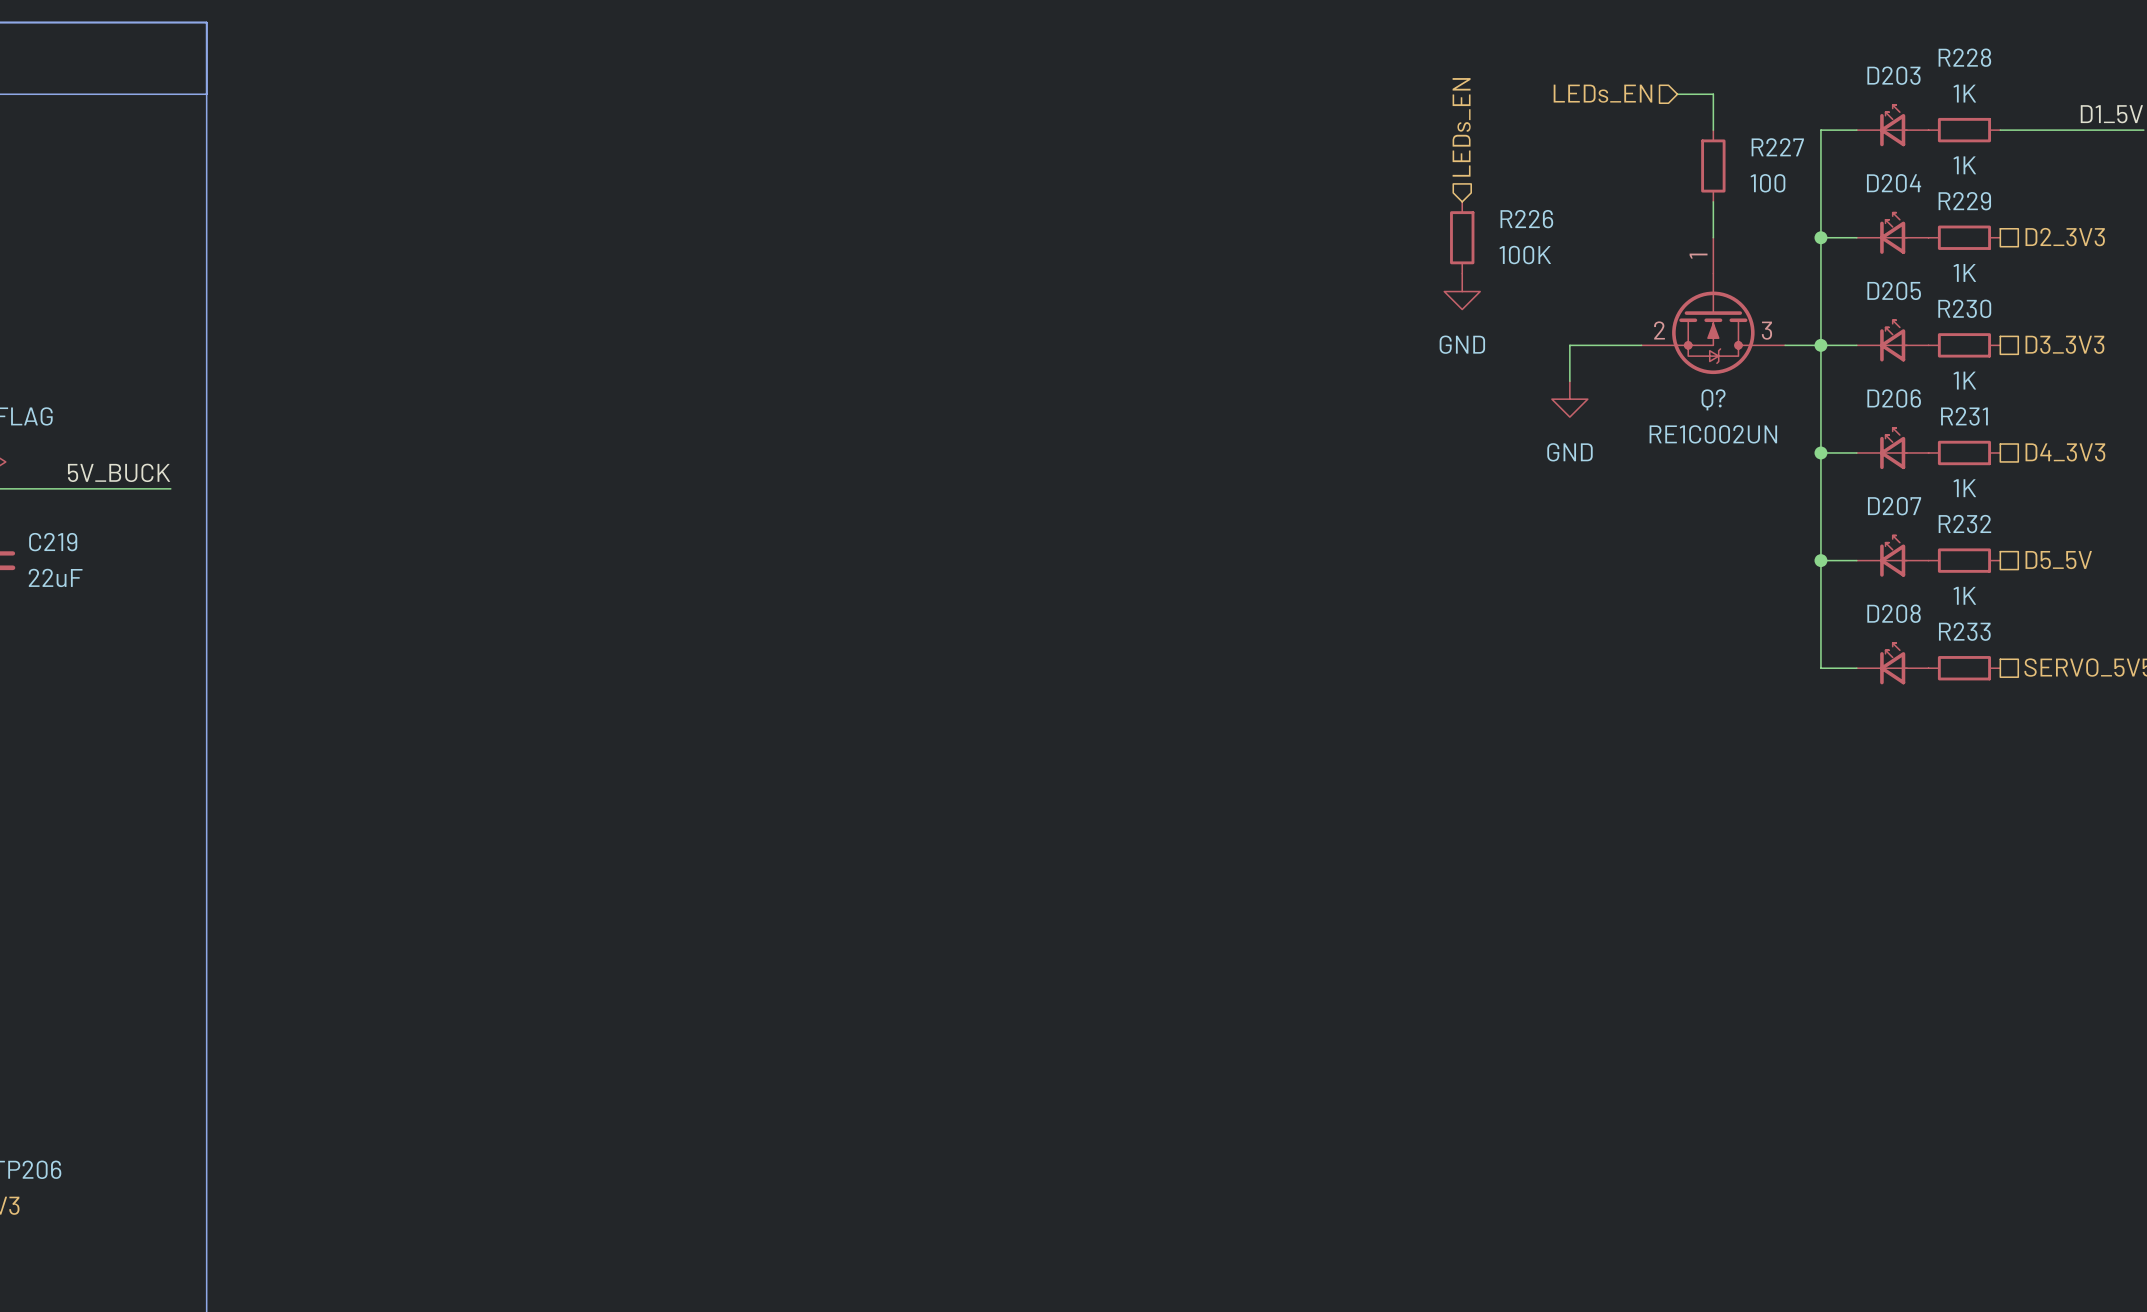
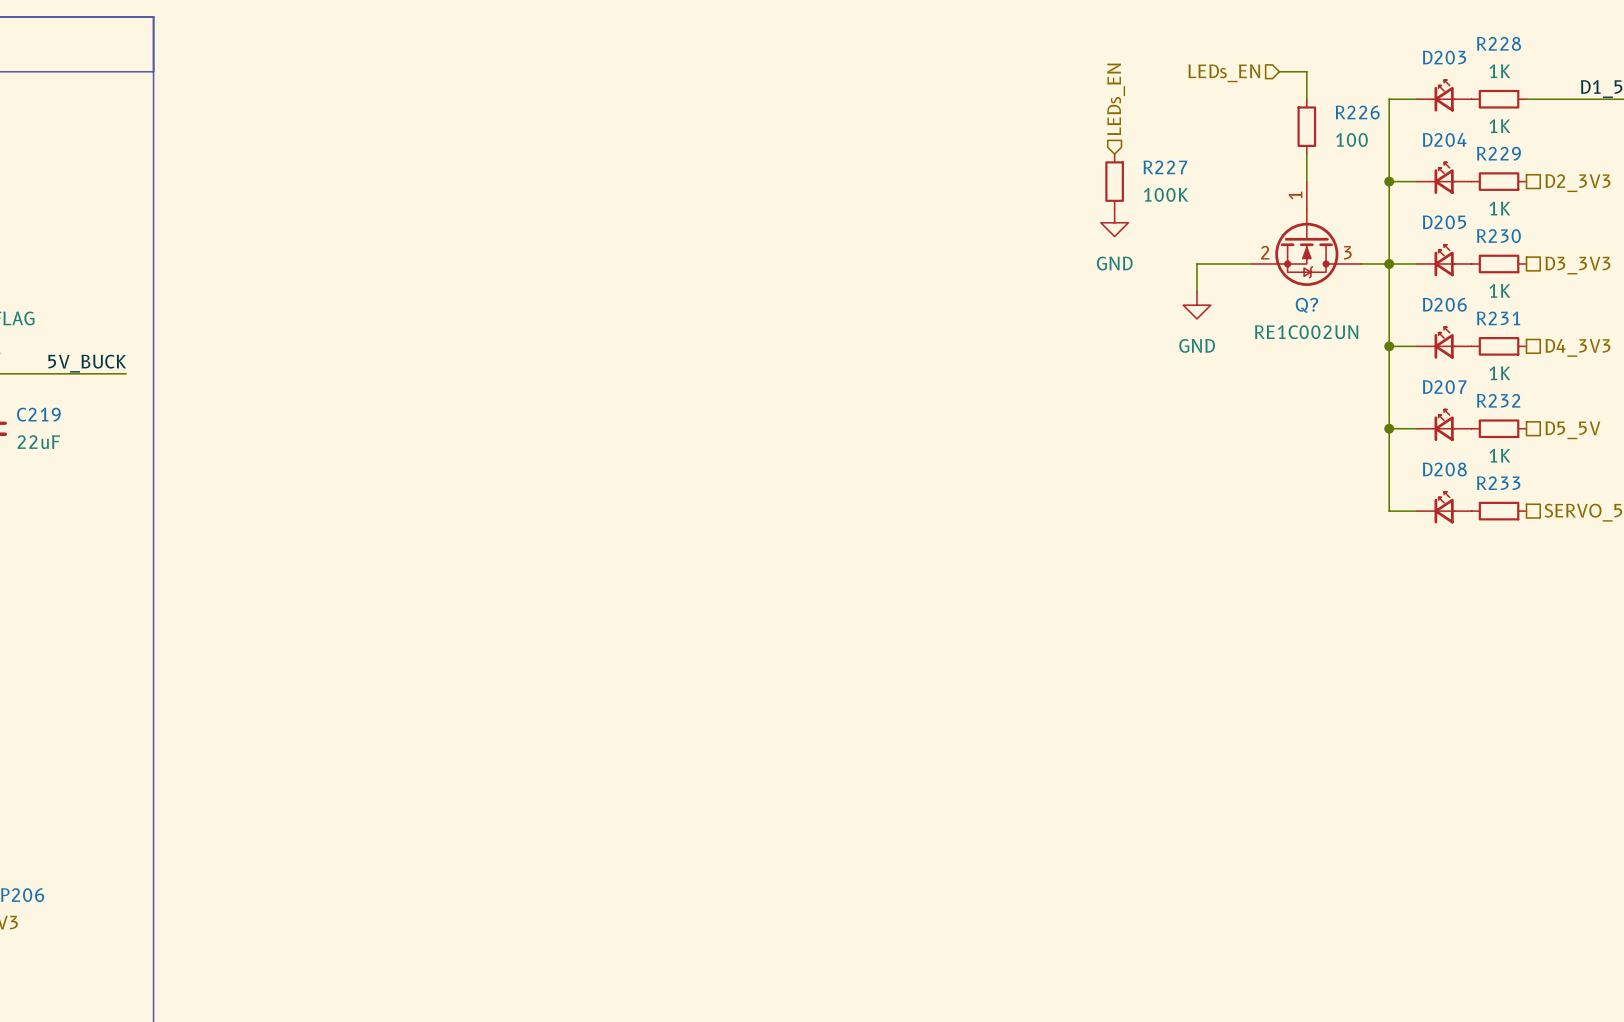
R227 name: R227 (1777, 147) -> R226 (1357, 112)
R226 name: R226 (1526, 219) -> R227 (1165, 167)

